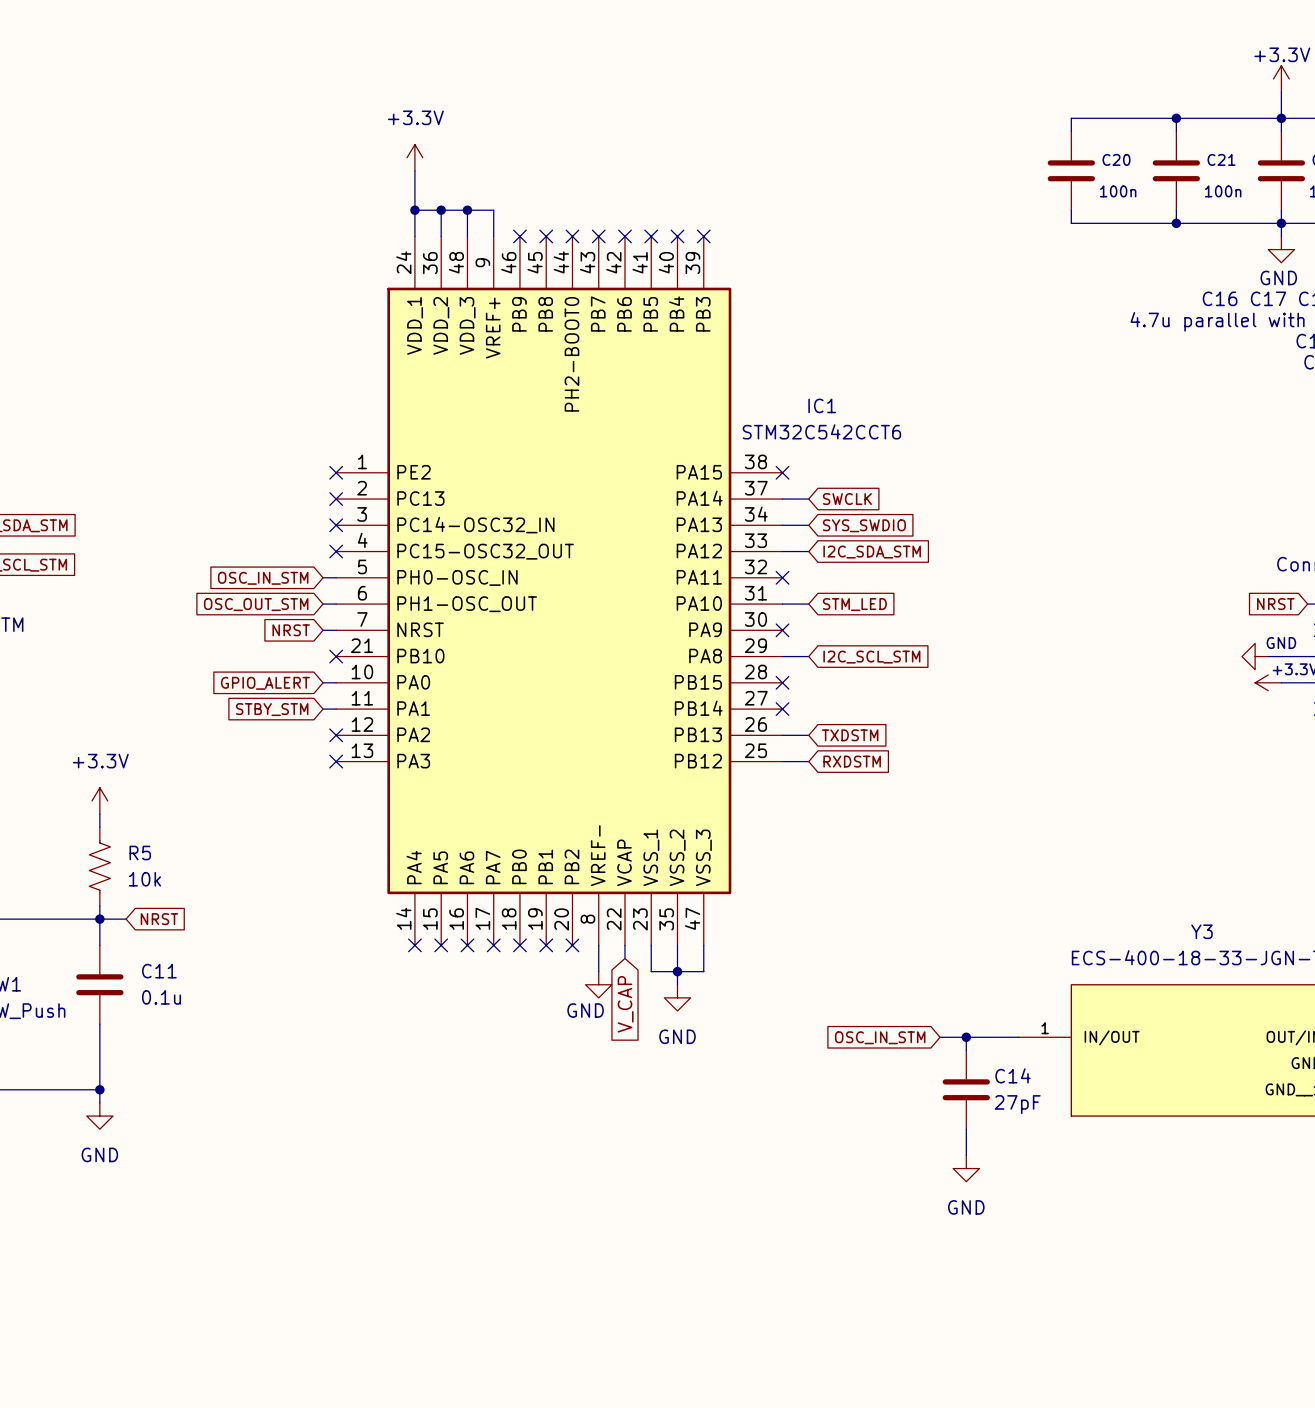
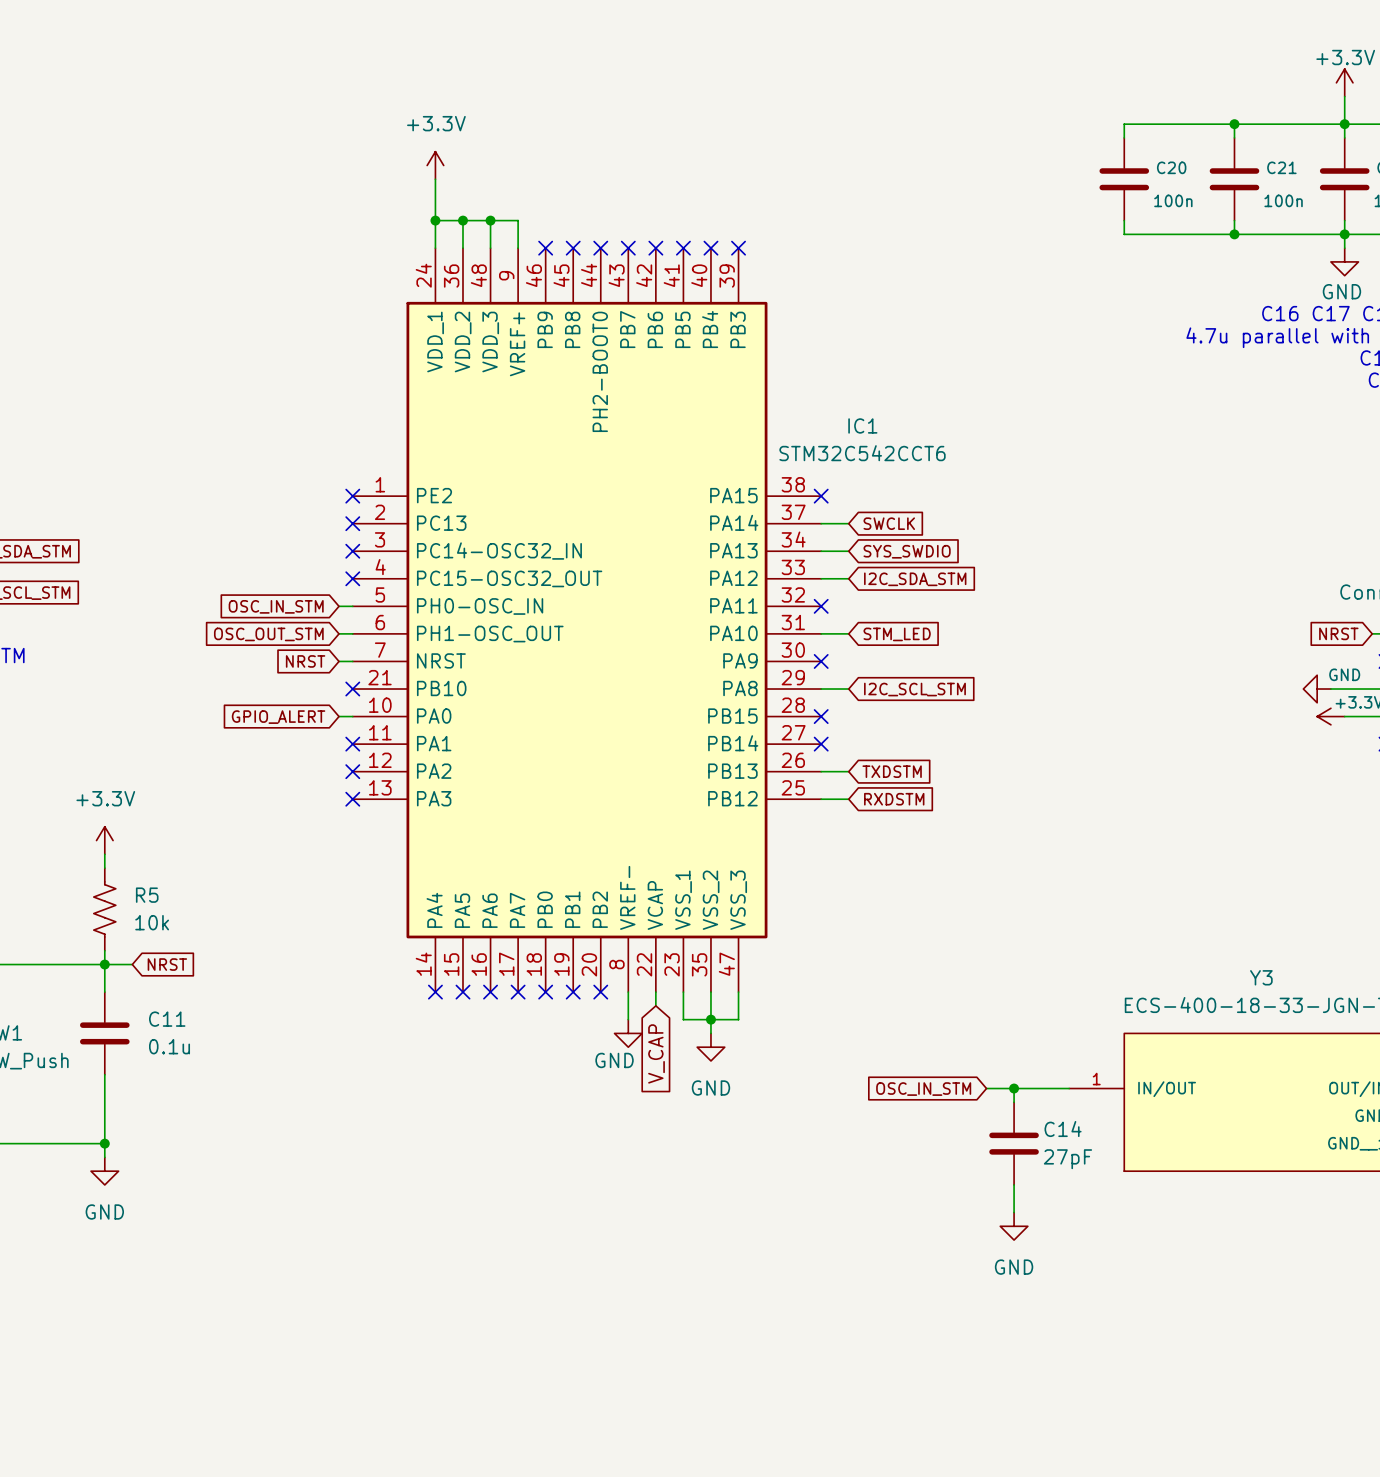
global label: STBY_STM (272, 709) -> none
wire: (323, 709) (336, 709) -> none
no-connect mark: none -> (352, 744)

